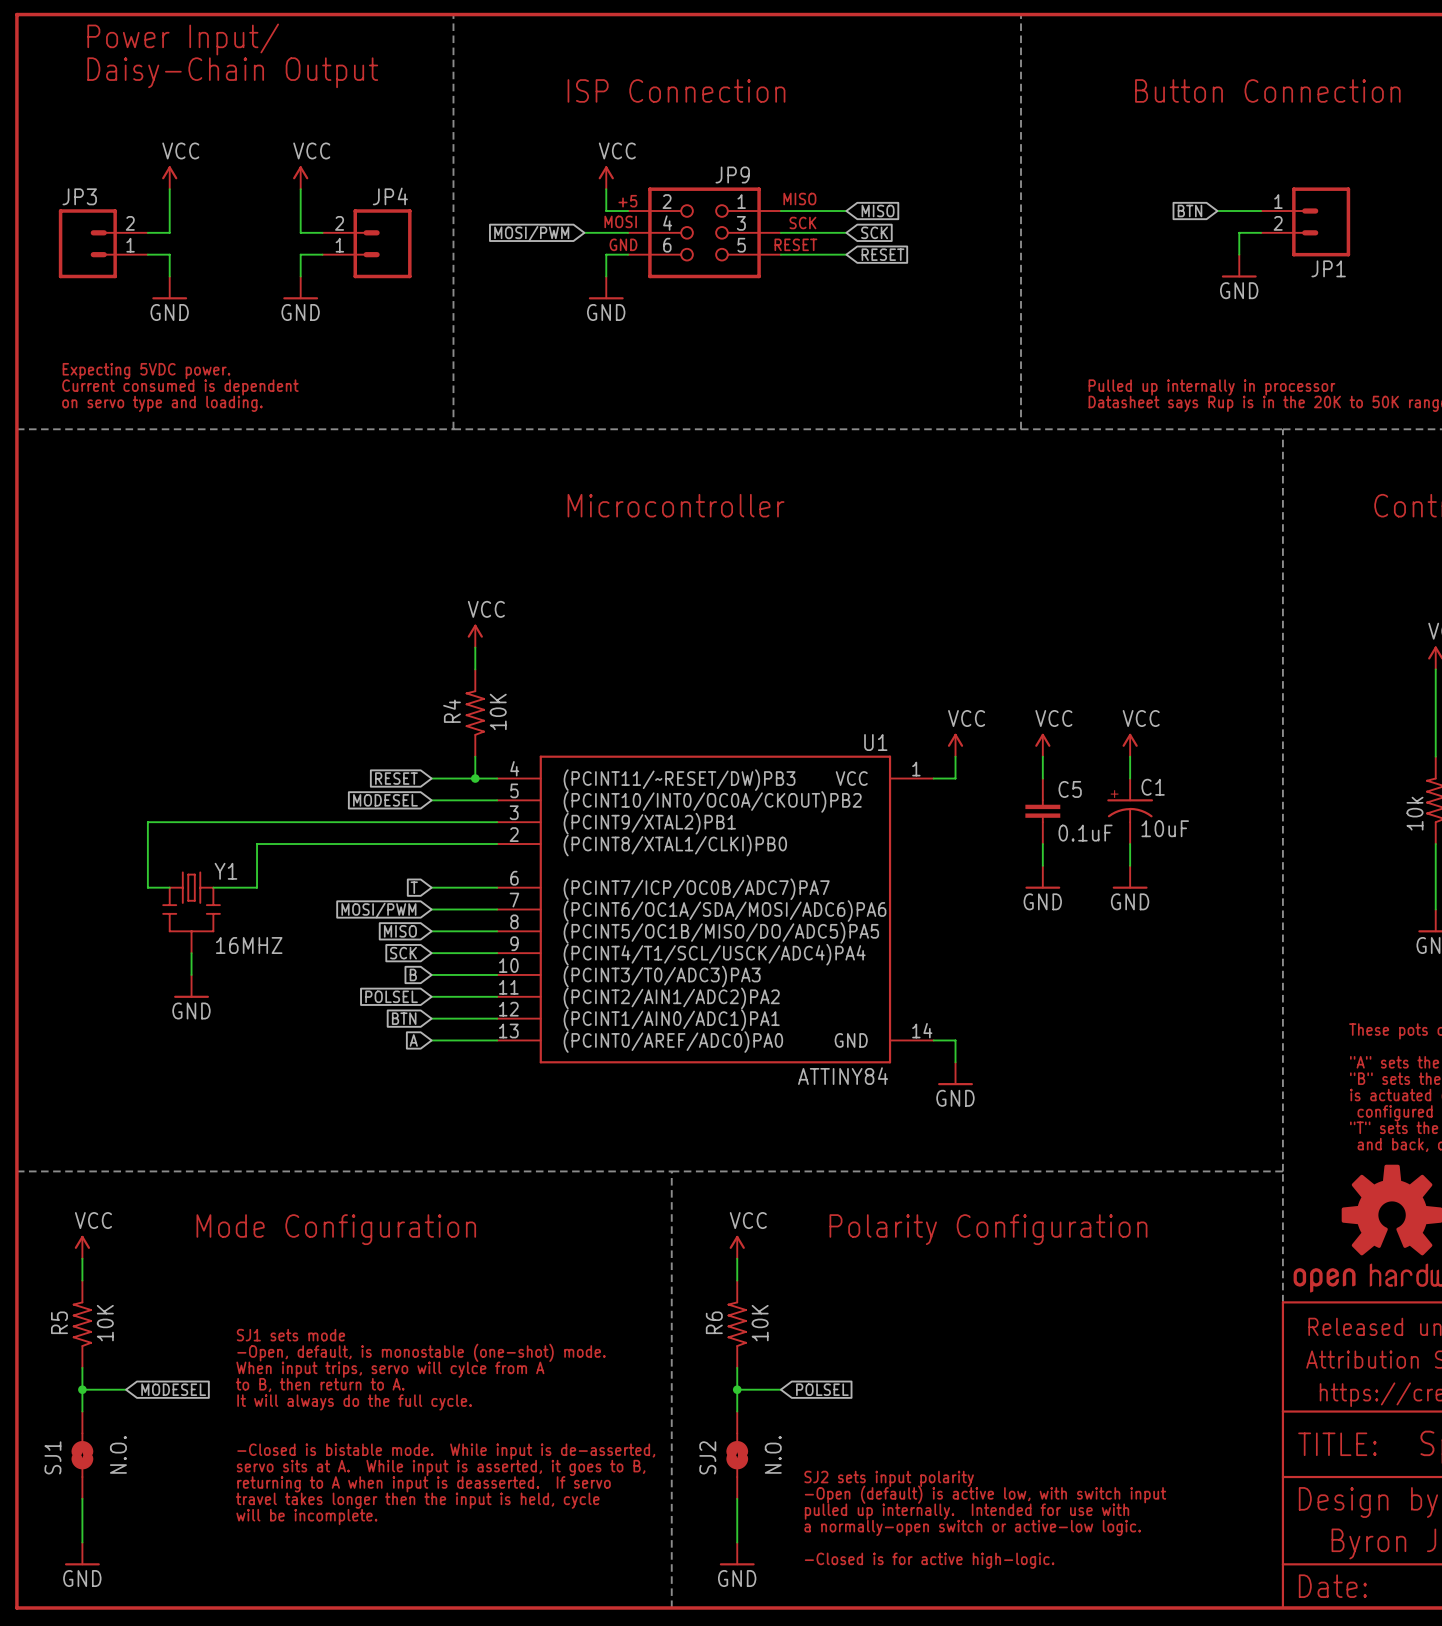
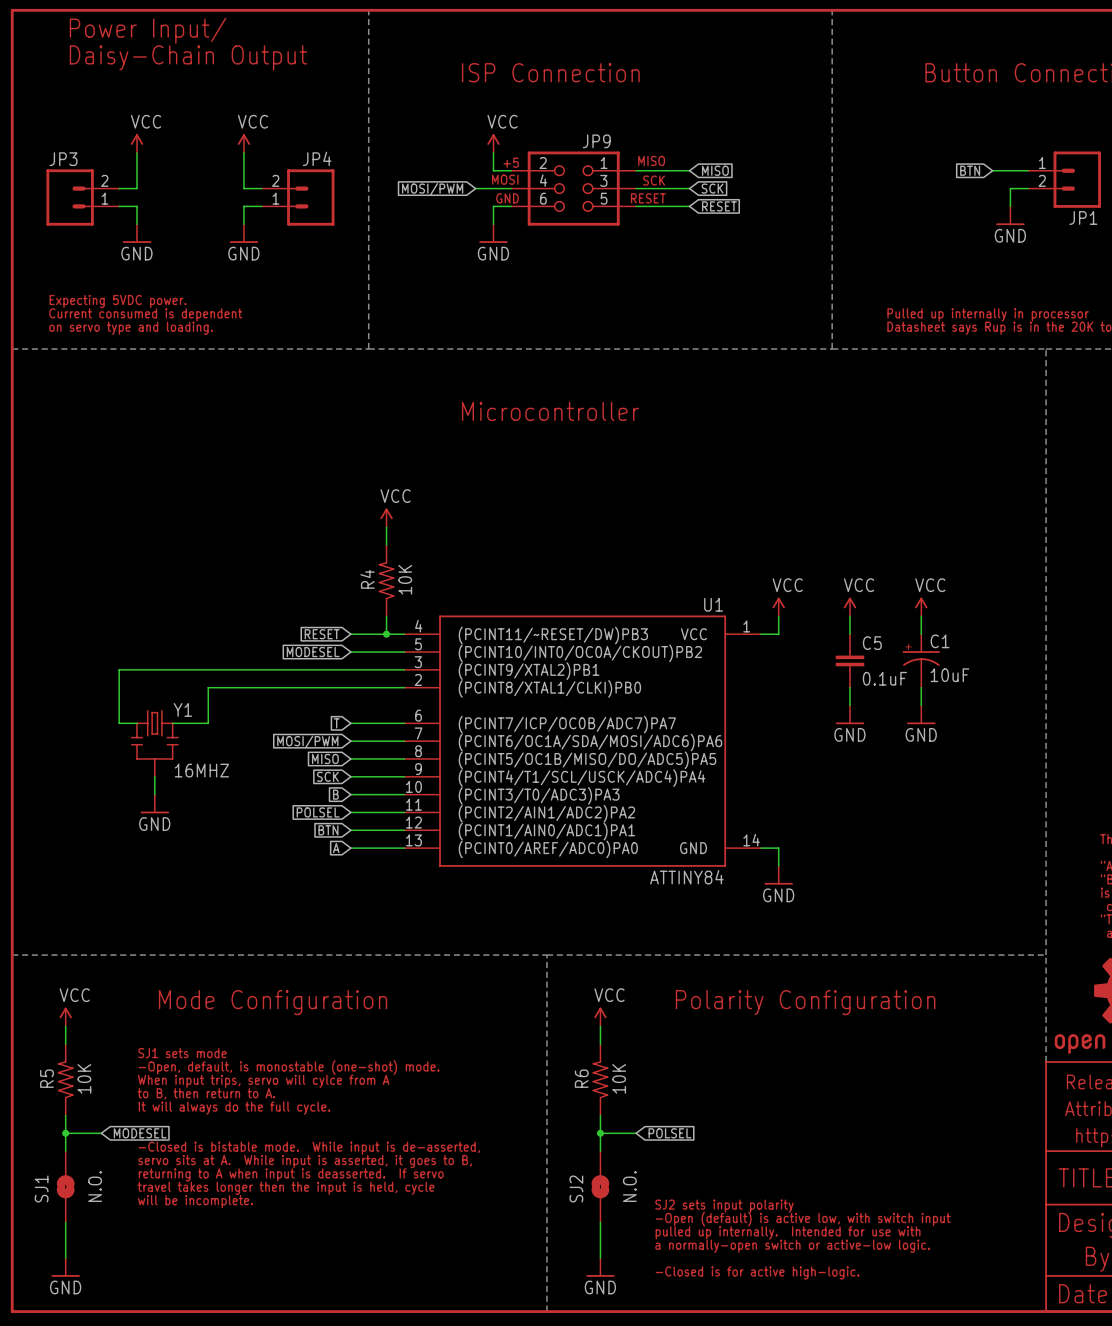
text position: SJ1 sets mode (290, 1335) -> SJ1 sets mode (182, 1053)
text position: -Open, default, is monostable (one-shot) mode. (421, 1352) -> -Open, default, is monostable (one-shot) mode. (289, 1067)
text position: When input trips, servo will cylce from A (390, 1369) -> When input trips, servo will cylce from A (263, 1081)
text position: to B, then return to A. (320, 1385) -> to B, then return to A. (206, 1093)
text position: It will always do the full cycle. (354, 1402) -> It will always do the full cycle. (234, 1108)
text position: -Closed is bistable mode. While input is de-asserted, (446, 1451) -> -Closed is bistable mode. While input is de-asserted, (309, 1148)
text position: servo sits at A. While input is asserted, it goes to B, (441, 1467) -> servo sits at A. While input is asserted, it goes to B, (305, 1161)
text position: returning to A when input is deasserted. If servo (424, 1484) -> returning to A when input is deasserted. If servo (291, 1174)
text position: travel takes longer then the input is held, cycle (417, 1500) -> travel takes longer then the input is held, cycle (286, 1188)
text position: will be incomplete. (306, 1517) -> will be incomplete. (195, 1201)

